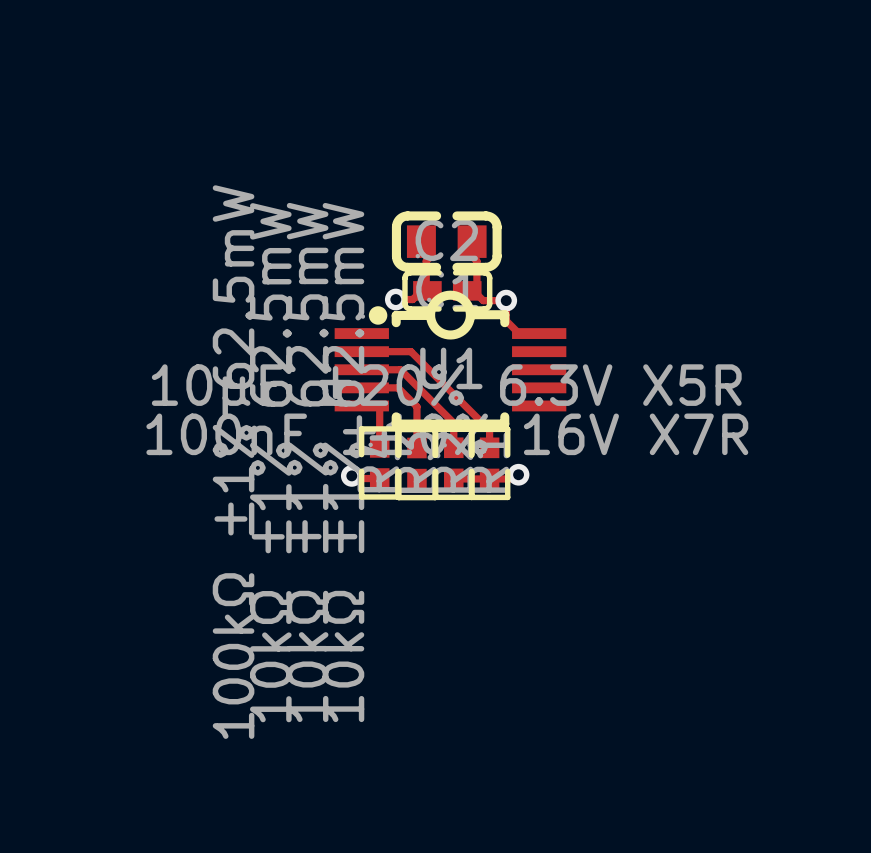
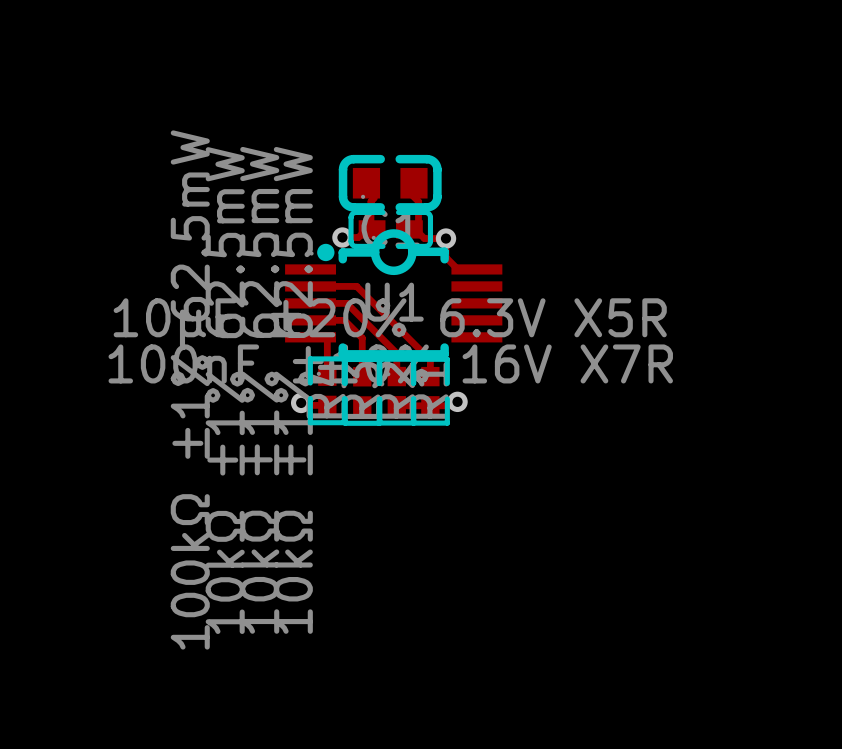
C2 name: C2 (446, 240) -> none

